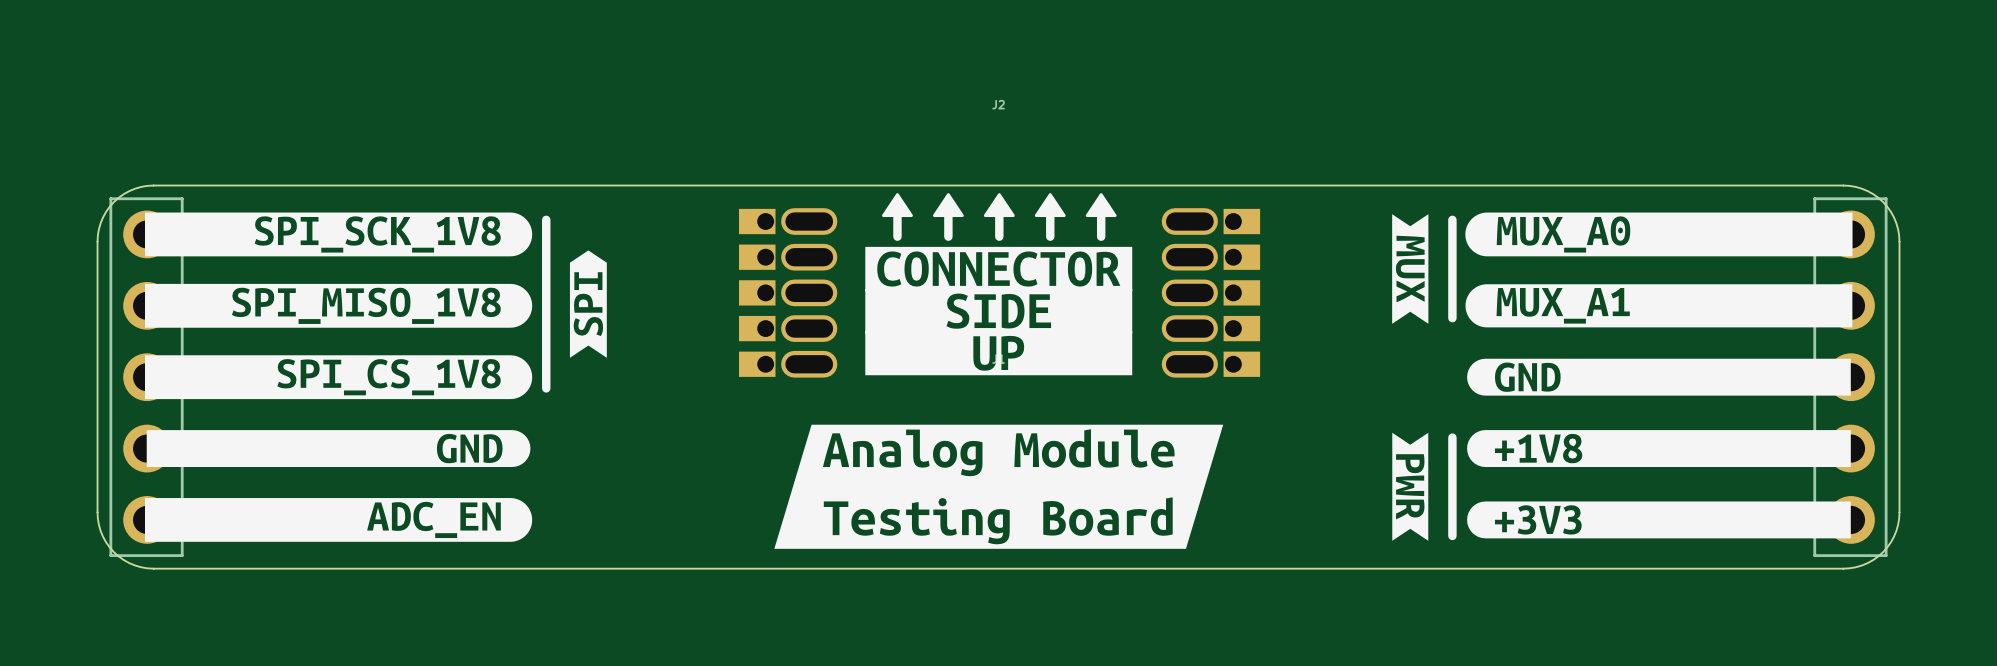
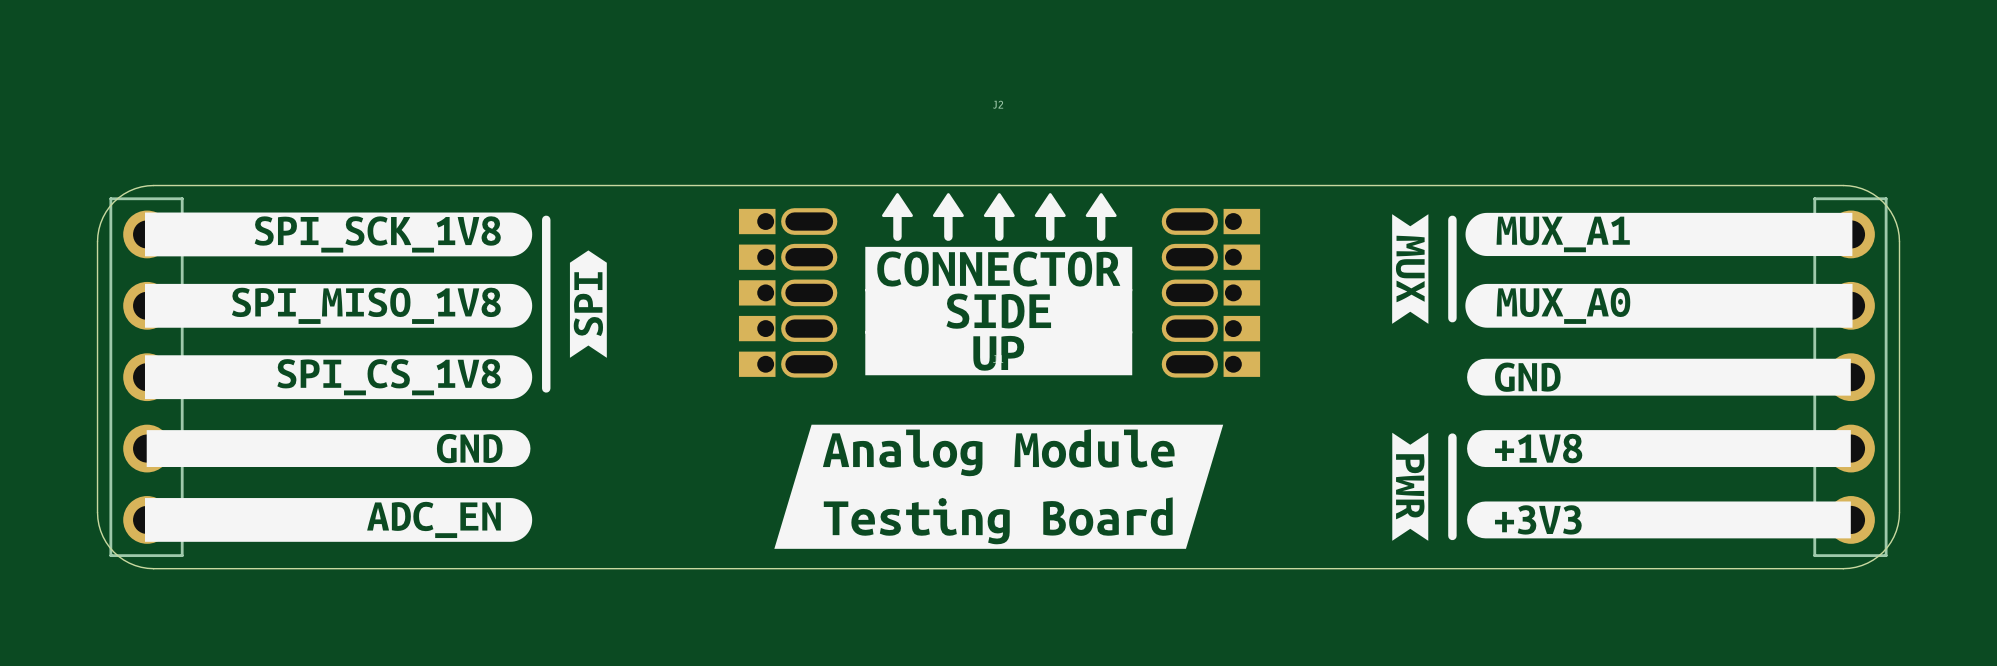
drawing position: (1658, 234) -> (1658, 305)
drawing position: (1658, 305) -> (1658, 234)

